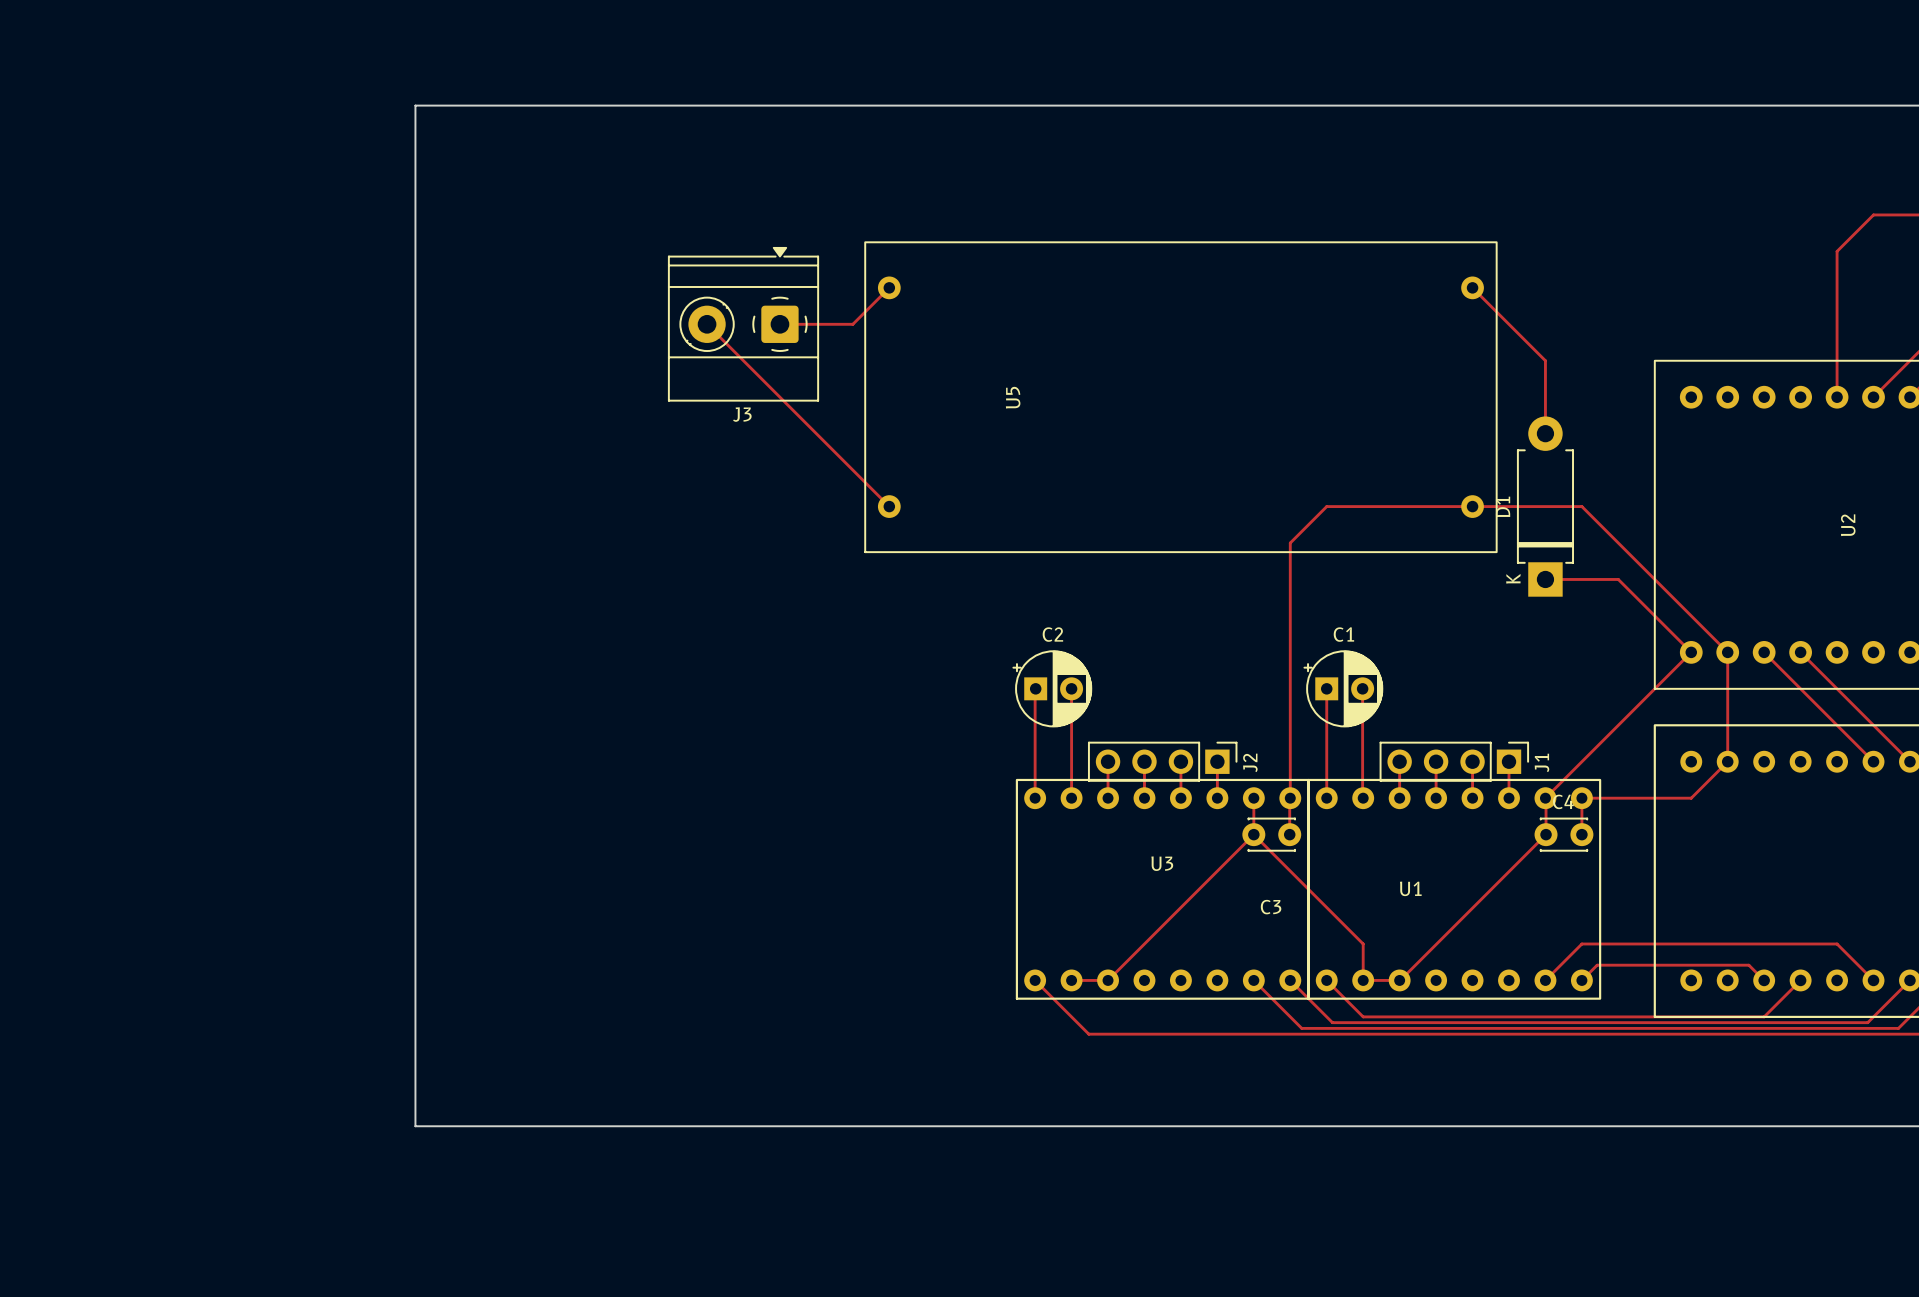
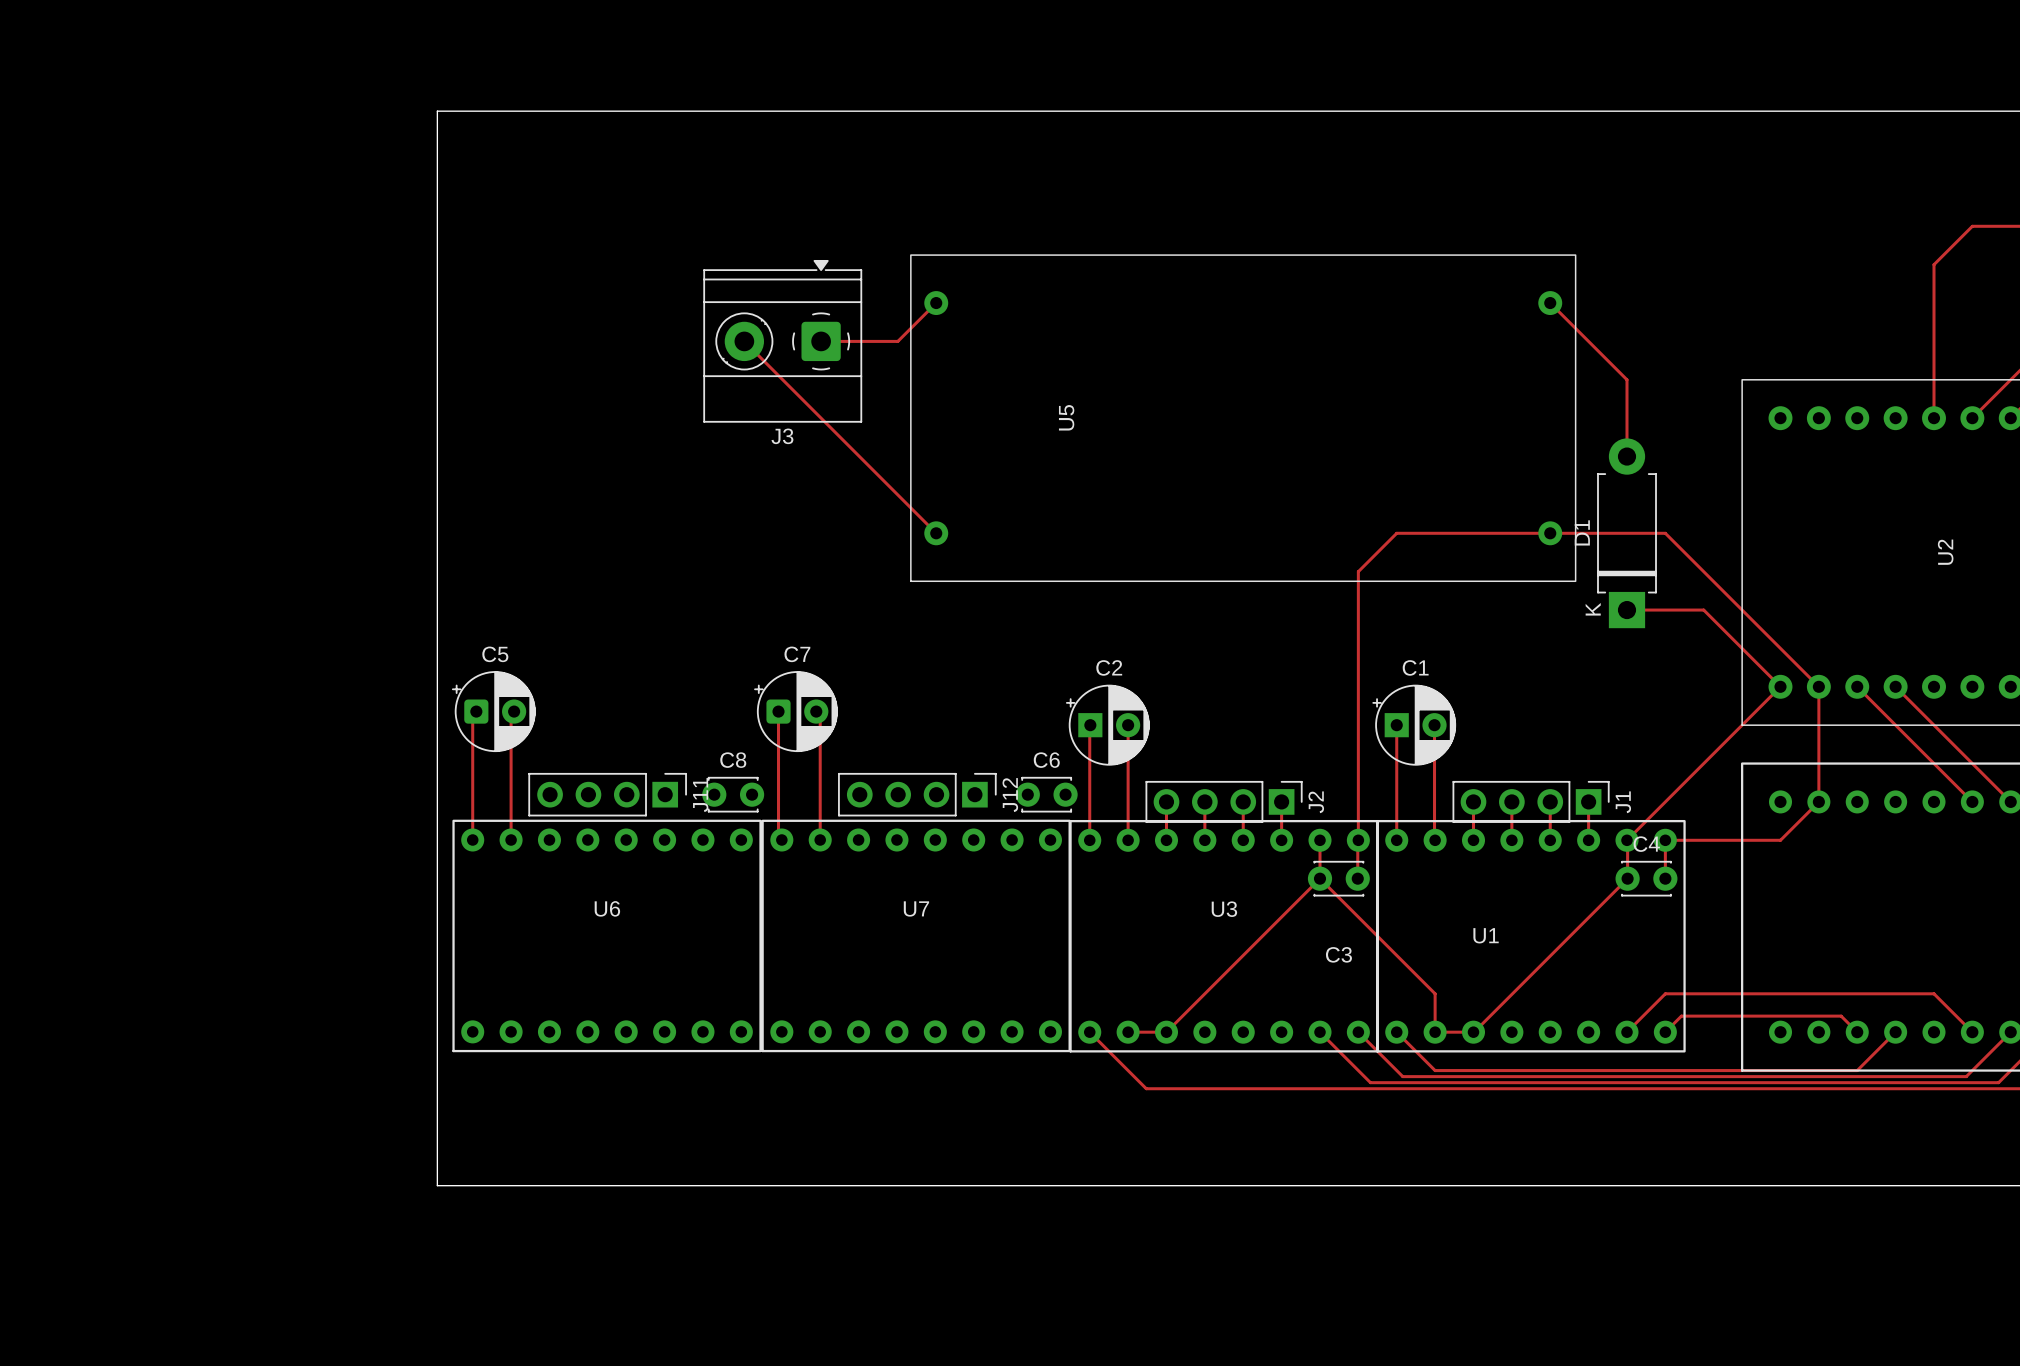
track: none -> (476, 711) (472, 715) (472, 840)
C5: none -> (493, 711)
track: none -> (514, 711) (511, 714) (511, 840)
track: none -> (778, 711) (778, 836) (781, 840)
C7: none -> (796, 711)
track: none -> (816, 711) (820, 715) (820, 840)
J11: none -> (607, 794)
C8: none -> (733, 794)
J12: none -> (917, 794)
C6: none -> (1046, 794)
U6: none -> (607, 935)
U7: none -> (916, 935)

